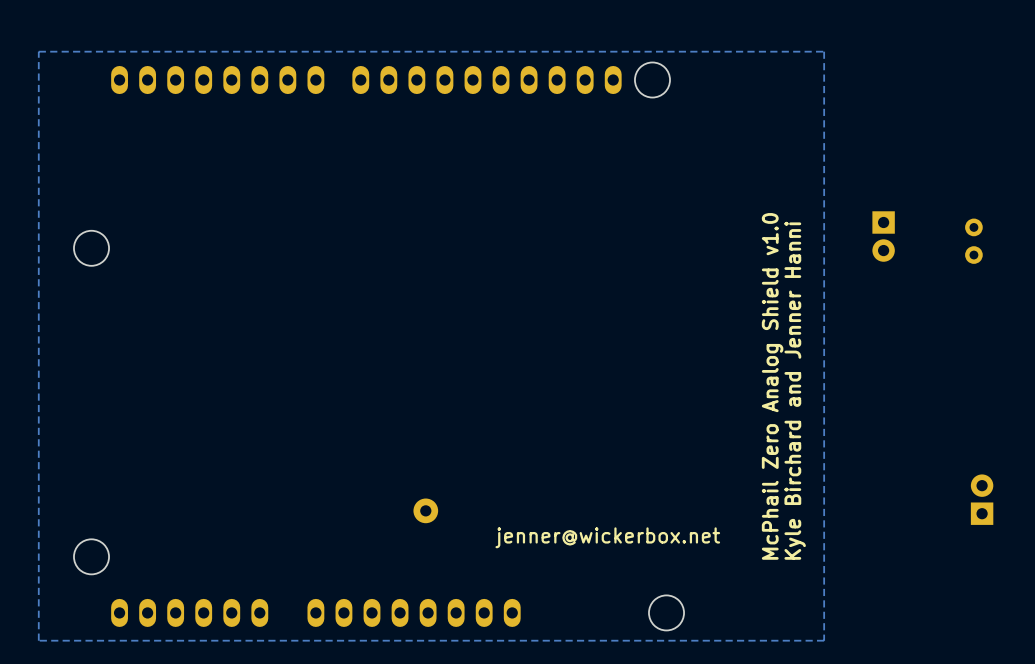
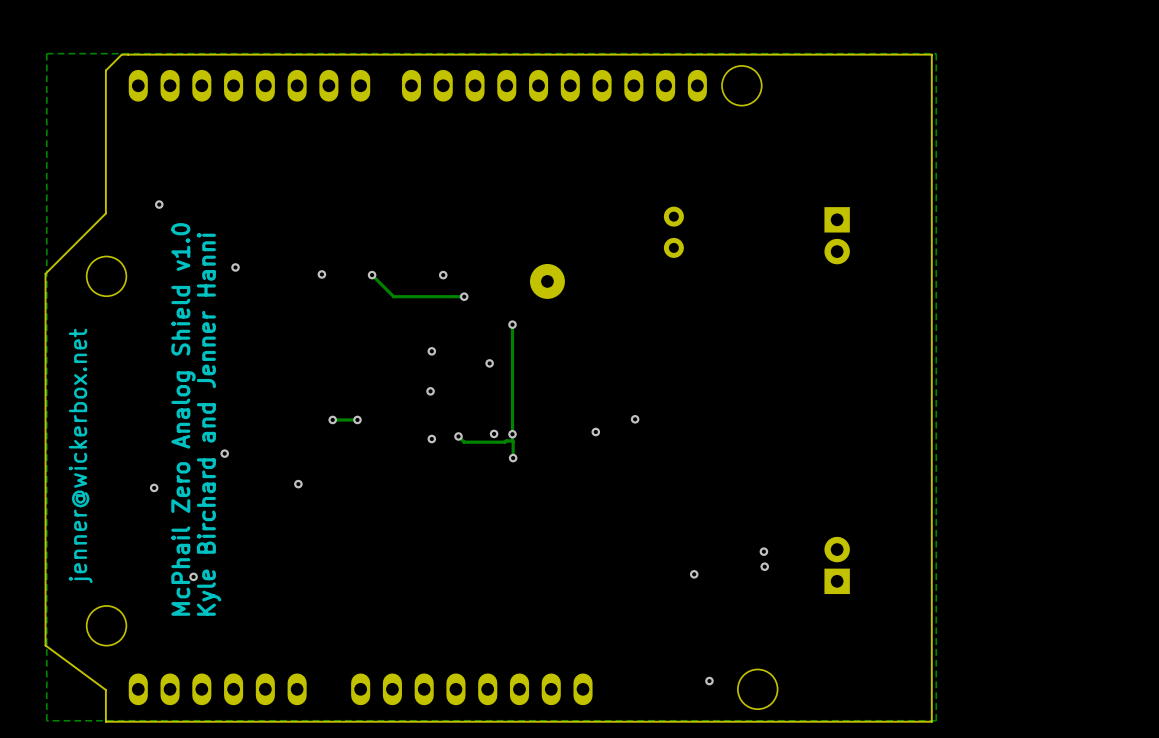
board edge: none -> (931, 54) (931, 721) (105, 721) (105, 689) (45, 645) (45, 273) (105, 213) (105, 70) (121, 54) (931, 54)
via: none -> (159, 204)
part: none -> (673, 232)
part position: (883, 236) -> (837, 235)
via: none -> (235, 267)
part: (973, 241) -> none
via: none -> (321, 274)
track: none -> (372, 275) (393, 296) (464, 296)
via: none -> (372, 275)
via: none -> (443, 275)
part: none -> (547, 281)
via: none -> (464, 296)
track: none -> (512, 324) (512, 440)
via: none -> (512, 324)
via: none -> (431, 351)
via: none -> (489, 363)
via: none -> (430, 391)
text: none -> McPhail Zero Analog Shield v1.0 (183, 419)
via: none -> (635, 419)
via: none -> (332, 419)
track: none -> (357, 419) (332, 419)
via: none -> (357, 419)
text: none -> Kyle Birchard and Jenner Hanni (209, 424)
via: none -> (595, 432)
text: McPhail Zero Analog Shield v1.0 (772, 386) -> none
via: none -> (494, 433)
via: none -> (512, 434)
track: none -> (458, 436) (464, 442) (512, 440)
via: none -> (458, 436)
text: Kyle Birchard and Jenner Hanni (795, 390) -> none
via: none -> (431, 439)
track: none -> (512, 440) (513, 458)
via: none -> (224, 453)
text: none -> jenner@wickerbox.net (80, 455)
via: none -> (513, 458)
via: none -> (298, 484)
via: none -> (154, 487)
via: none -> (763, 551)
part: (982, 499) -> none
part: none -> (837, 565)
via: none -> (764, 566)
part: (425, 510) -> none
via: none -> (694, 574)
via: none -> (193, 576)
text: jenner@wickerbox.net (607, 537) -> none
via: none -> (709, 681)

